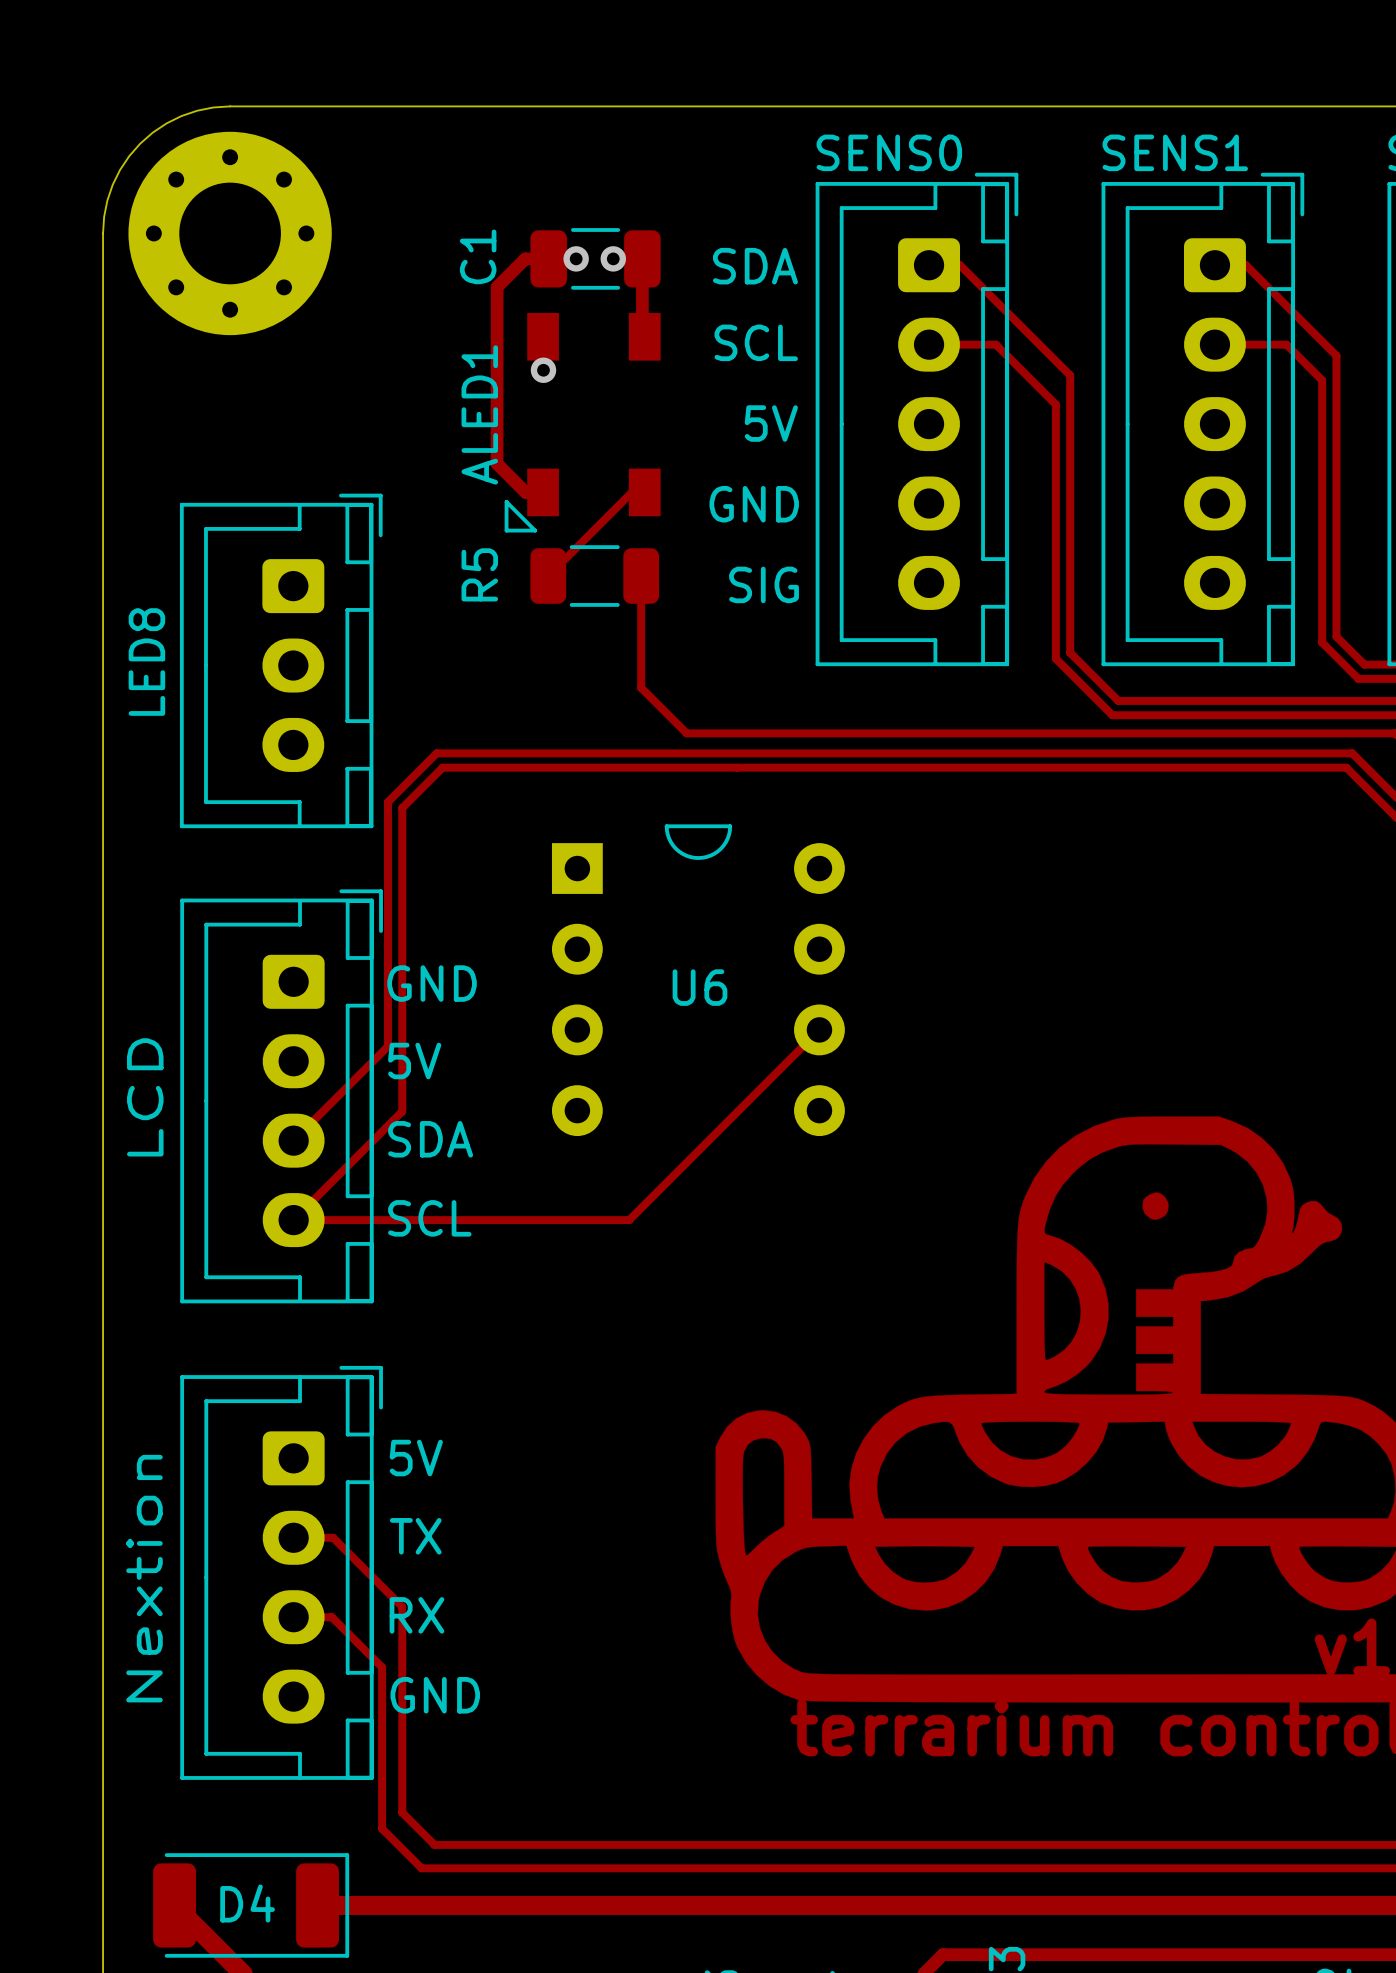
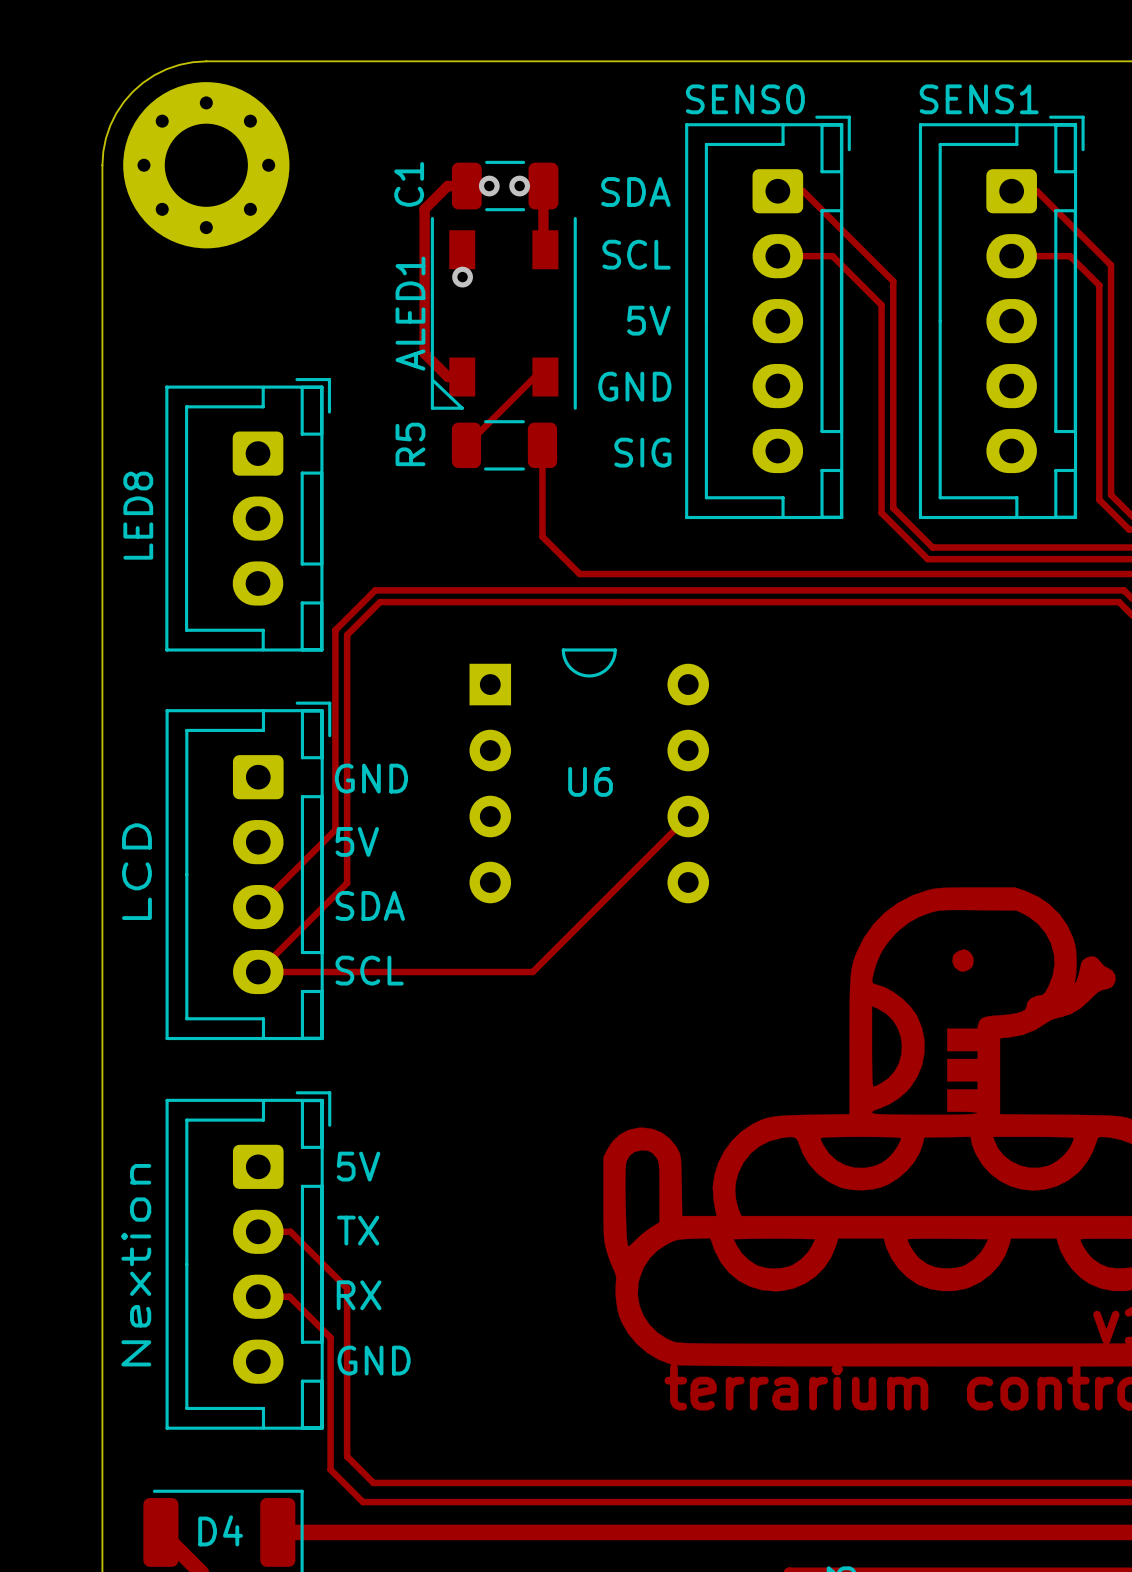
ALED1 footprint: [504, 312, 661, 533] -> [430, 217, 577, 410]
line: none -> (432, 380) (462, 408)

